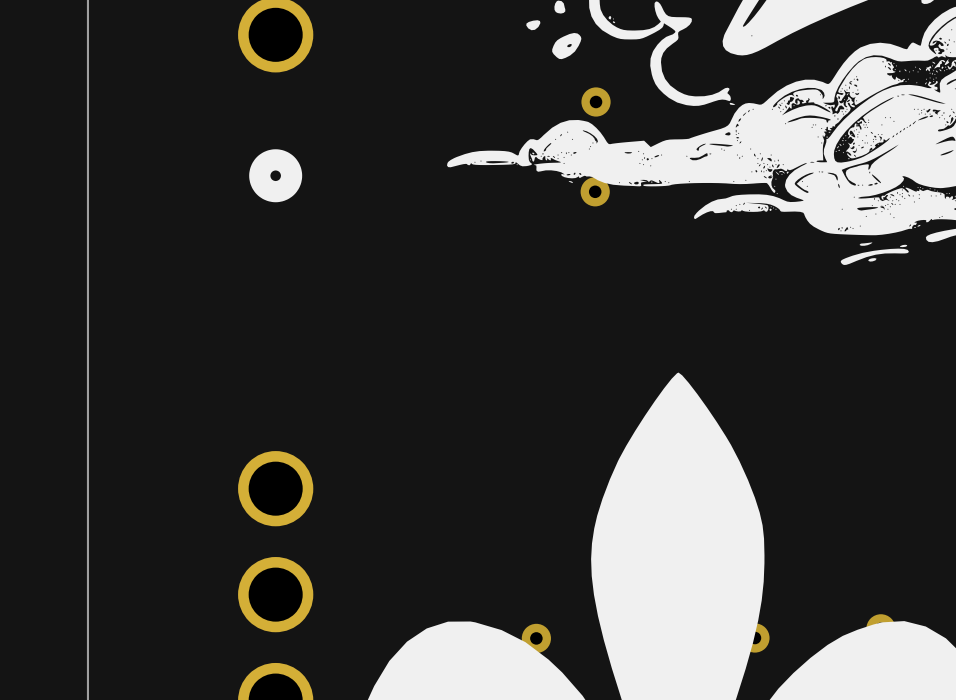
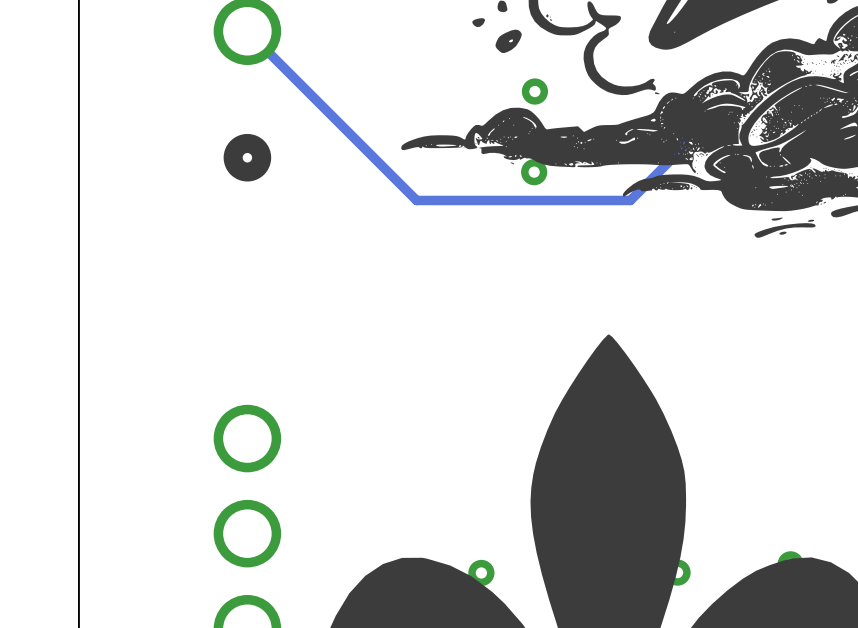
track: none -> (247, 31) (416, 200) (630, 200) (683, 146) (683, 125)

